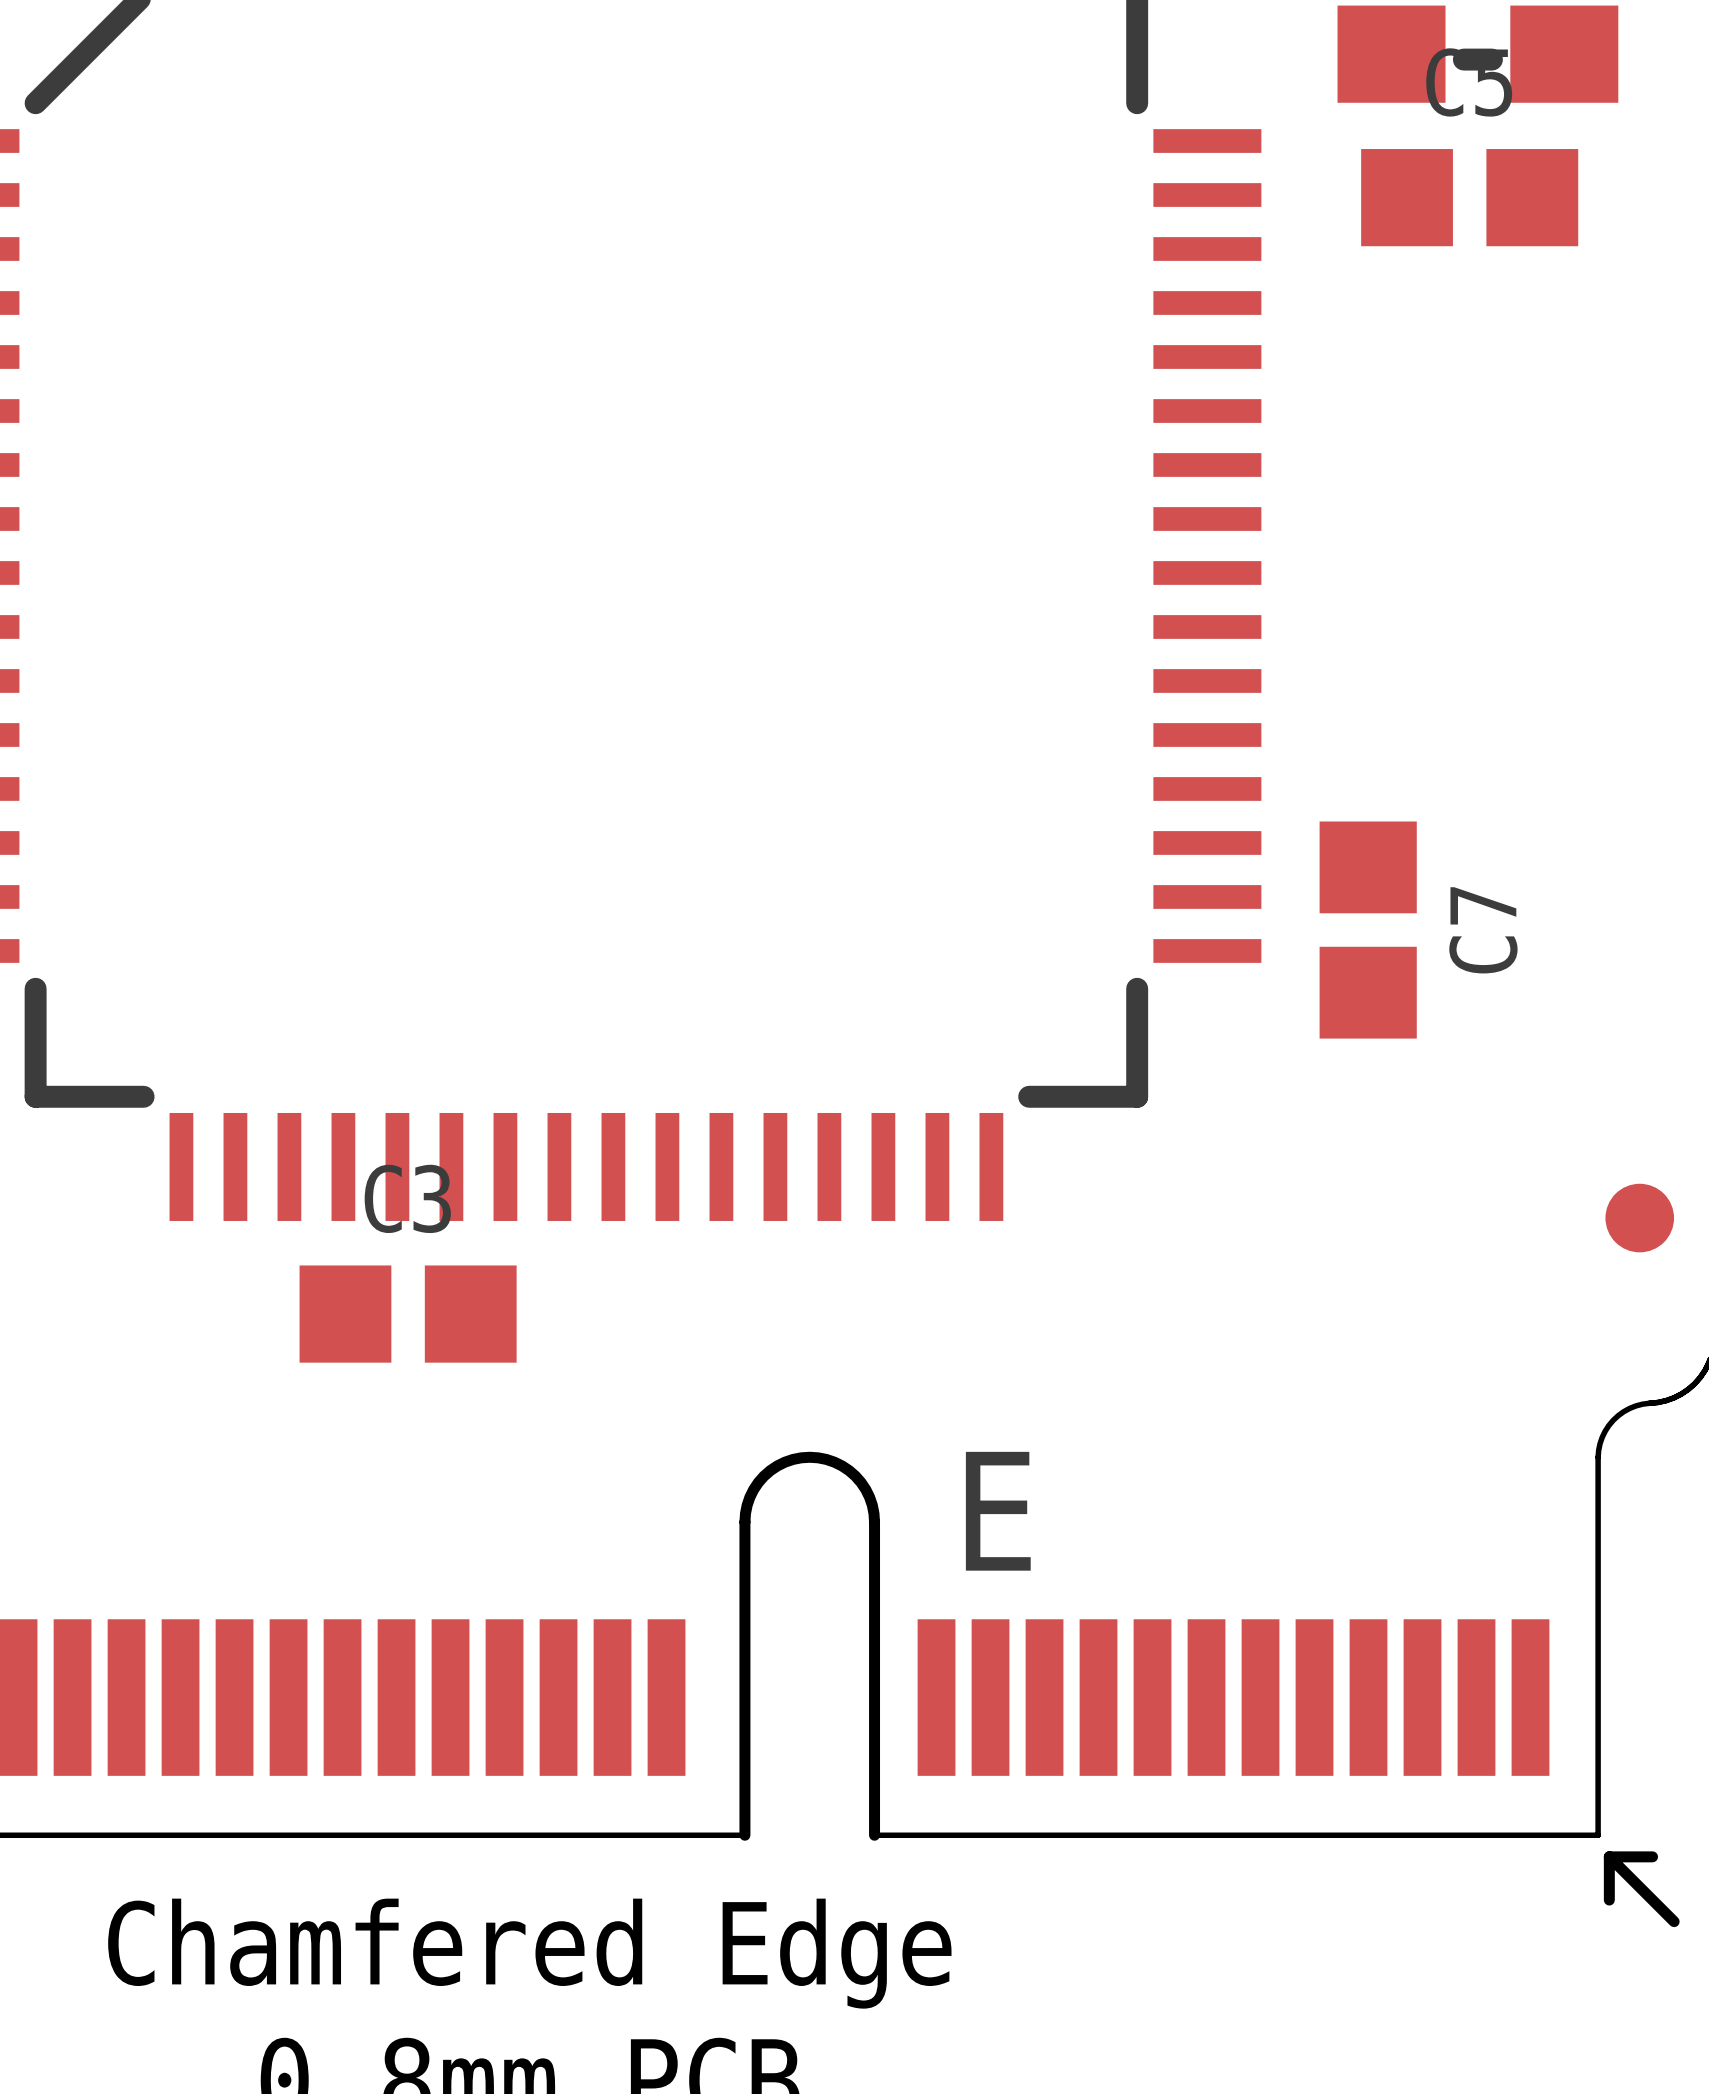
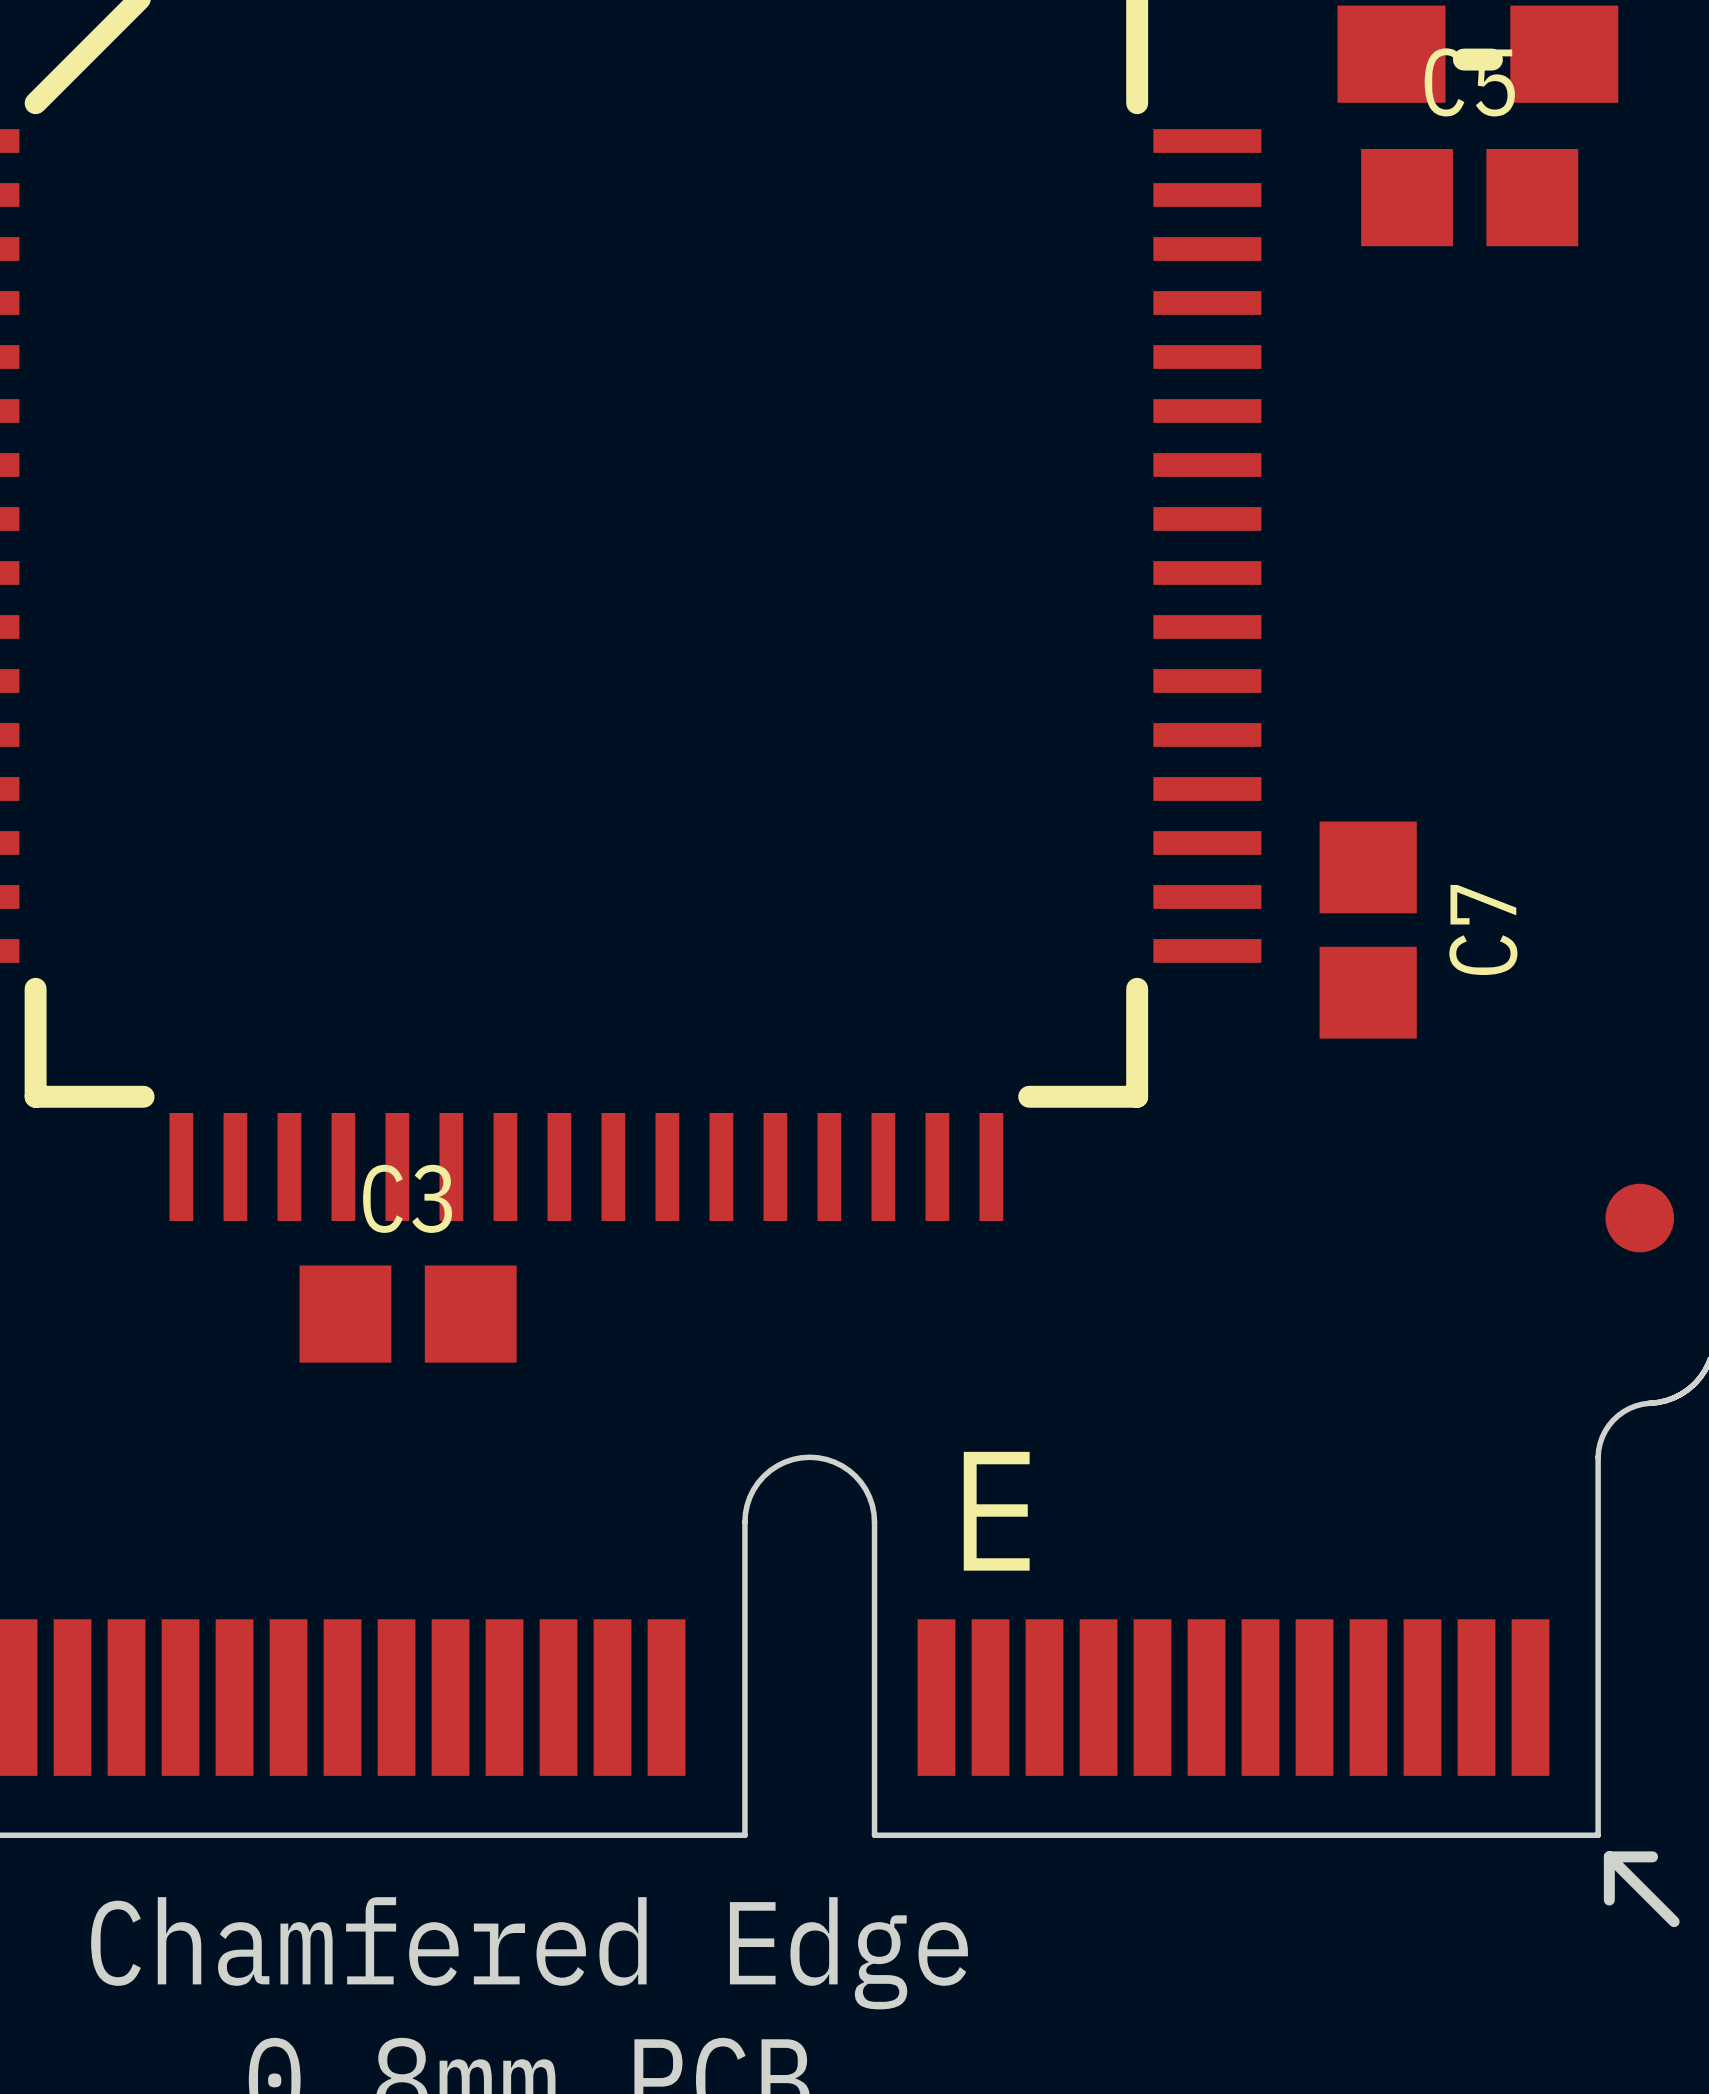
board edge width: thick (744, 1835) (745, 1513) (753, 1489) (763, 1476) (784, 1462) (809, 1457) (834, 1462) (855, 1476) (865, 1489) (873, 1513) (874, 1835) -> thin (744, 1835) (745, 1513) (753, 1489) (763, 1476) (784, 1462) (809, 1457) (834, 1462) (855, 1476) (865, 1489) (873, 1513) (874, 1835)

